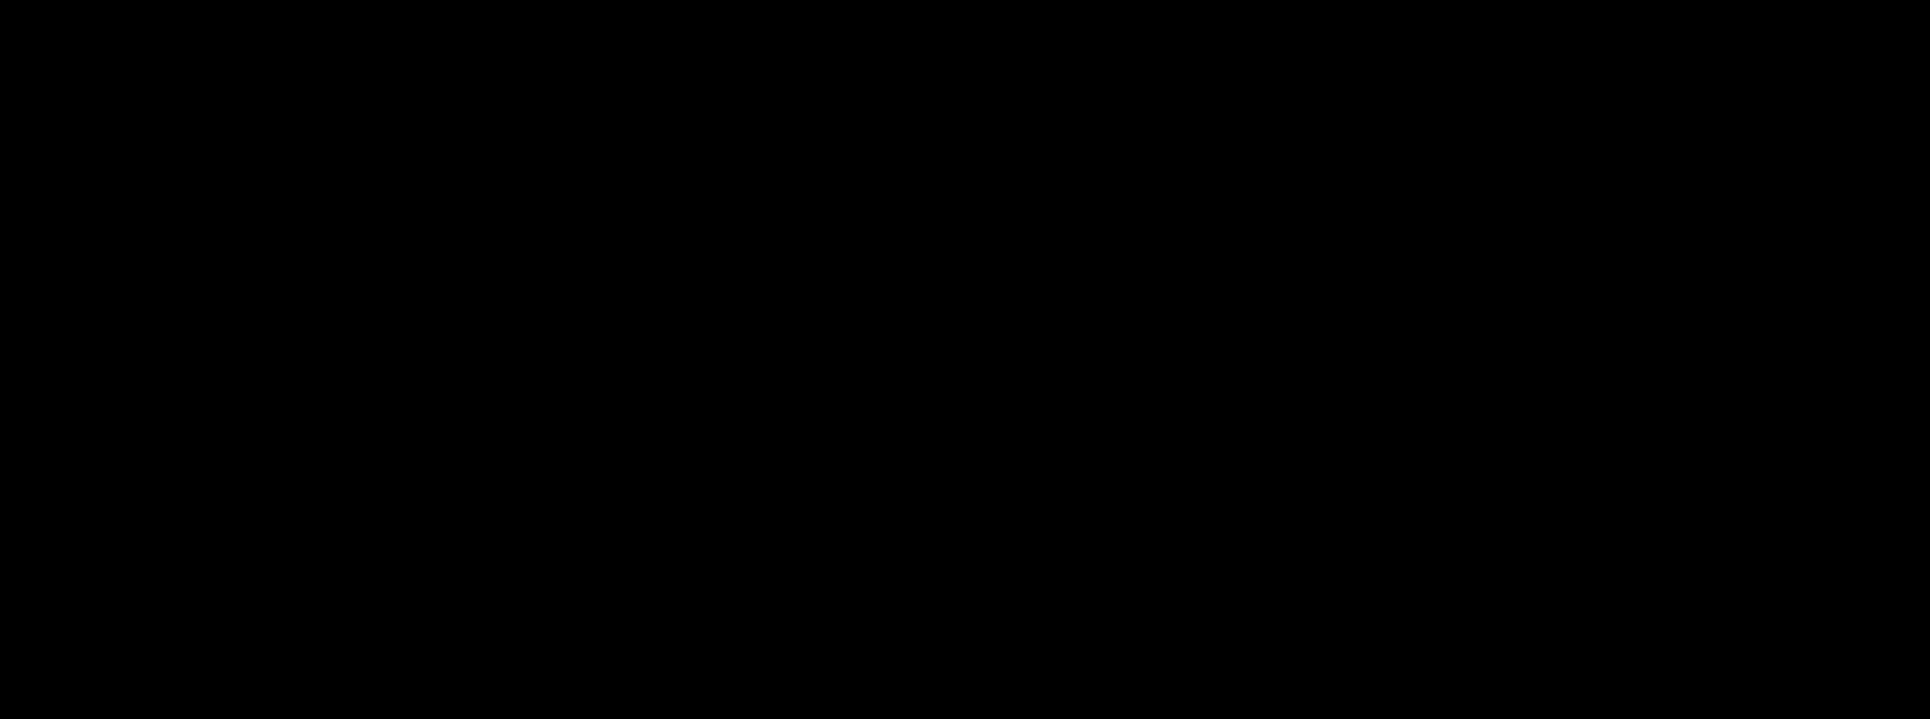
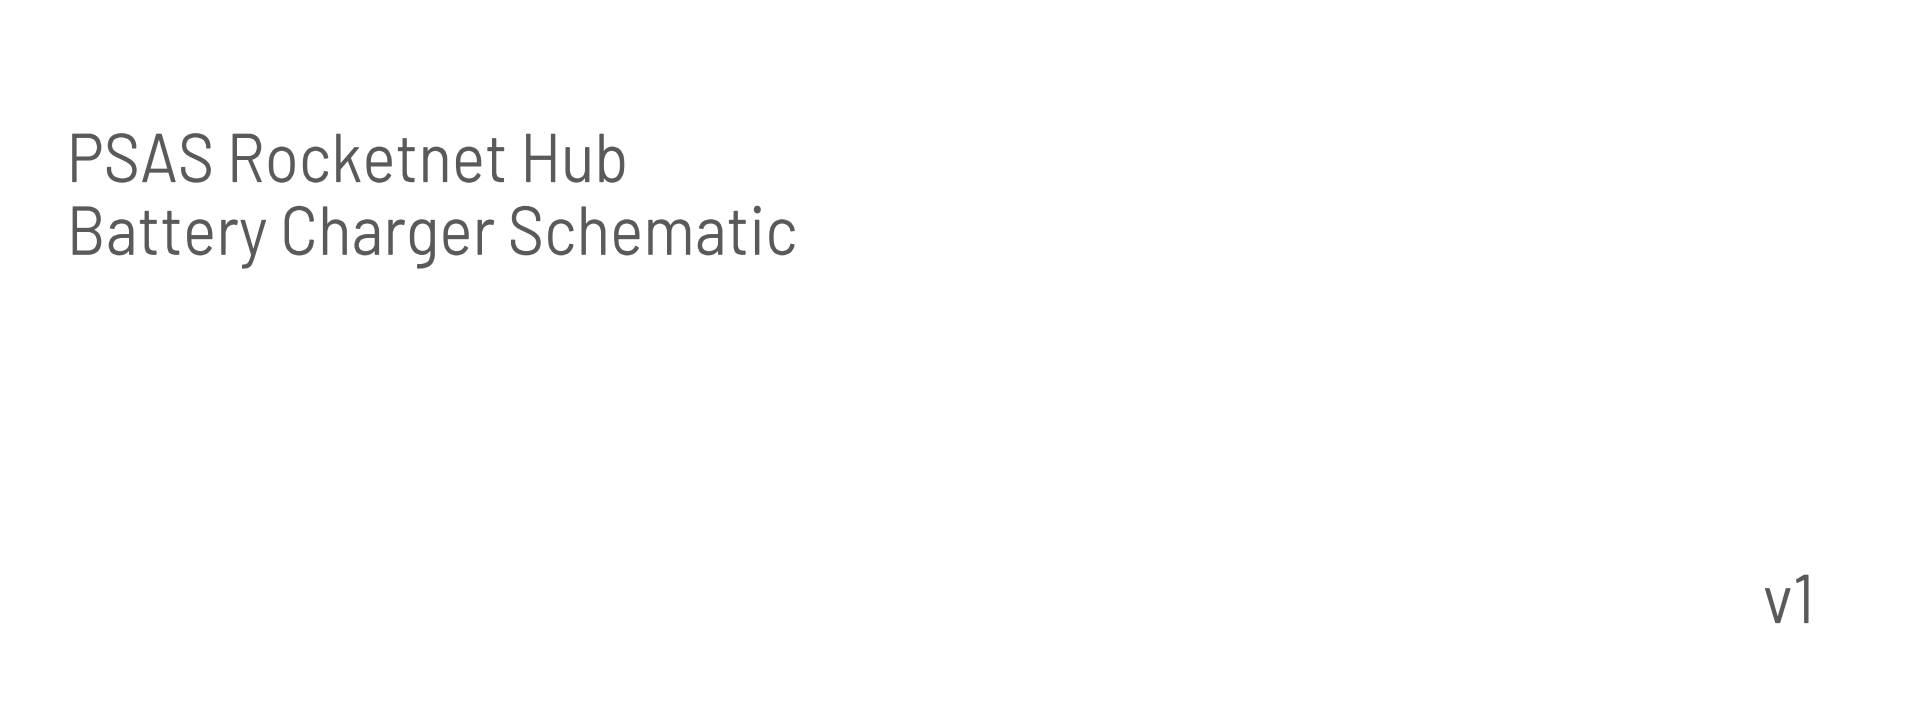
text: none -> PSAS Rocketnet Hub (348, 157)
text: none -> Battery Charger Schematic (433, 237)
text: none -> v1 (1786, 598)

